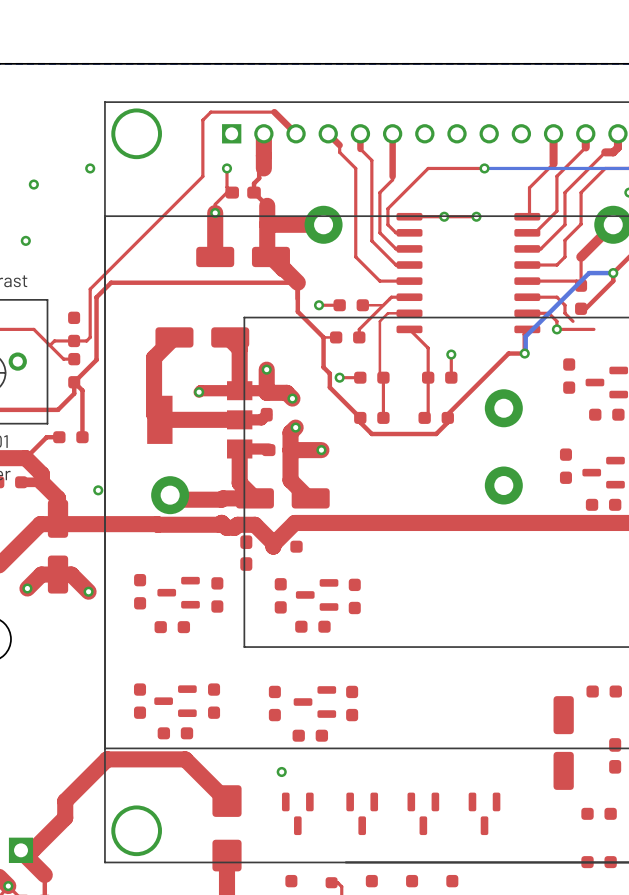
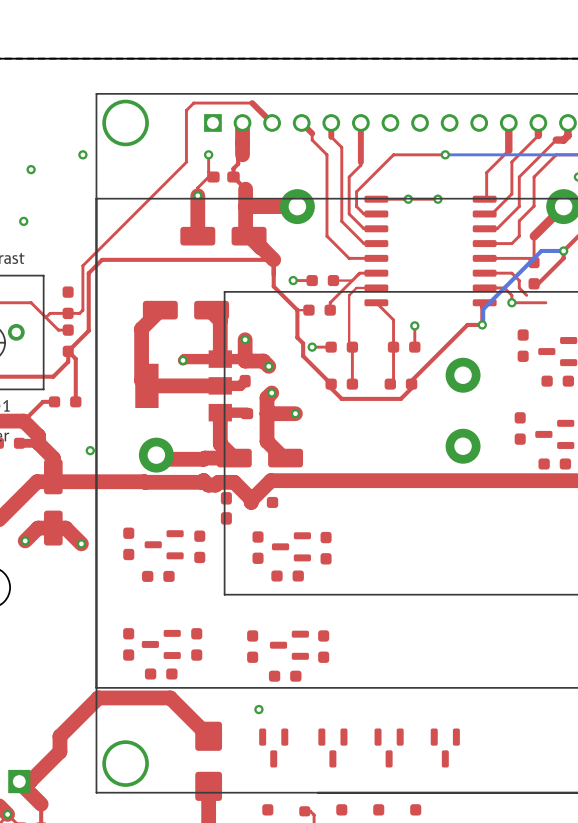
part: (604, 691) -> none
part: (563, 743) -> none
part: (615, 755) -> none
part: (599, 813) -> none
part: (599, 862) -> none

